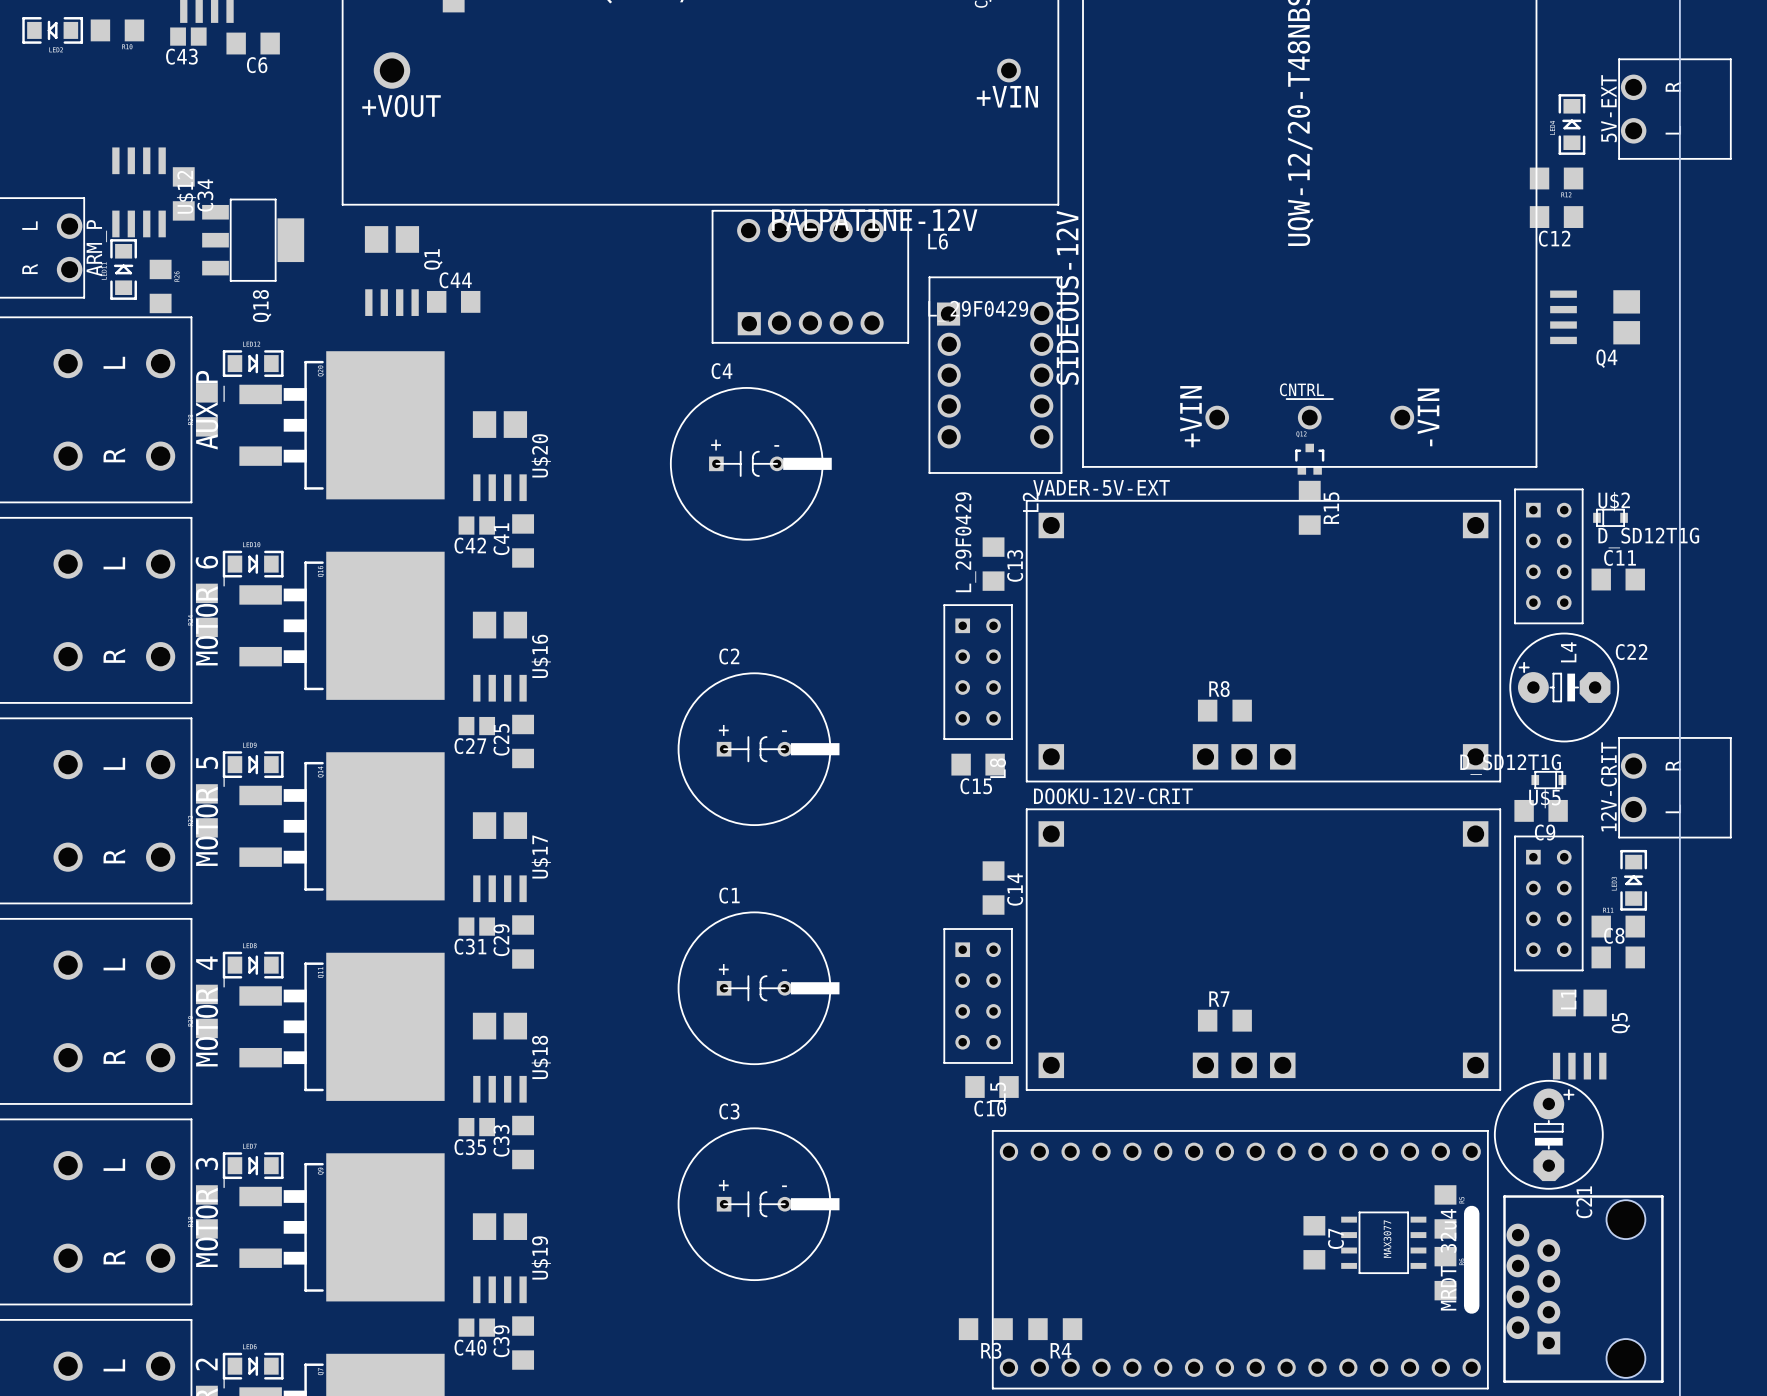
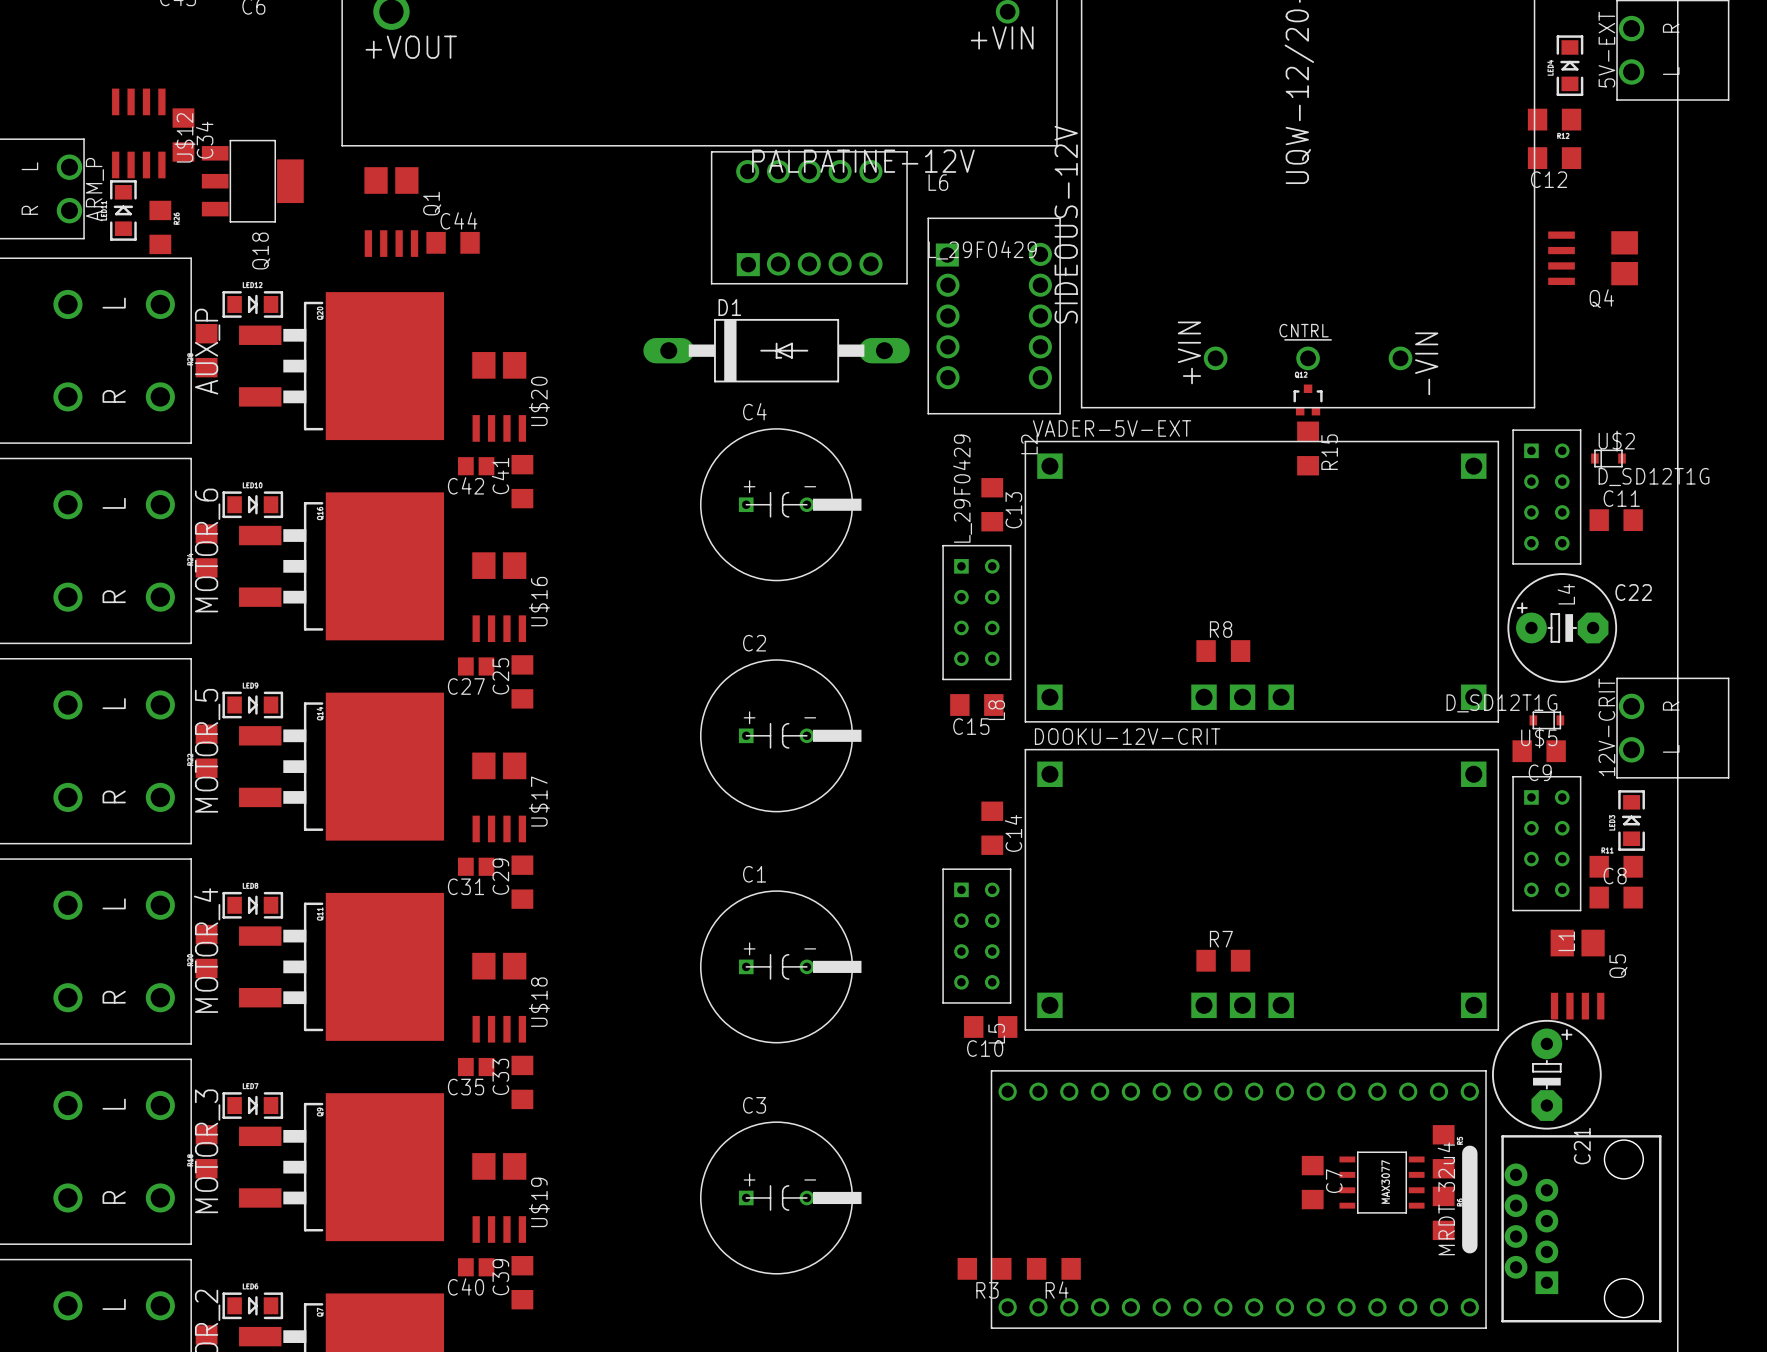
D1: none -> (776, 350)
C4 position: (750, 463) -> (780, 504)
C2 position: (758, 749) -> (780, 735)
C1 position: (758, 988) -> (780, 966)
C3 position: (758, 1204) -> (780, 1197)

